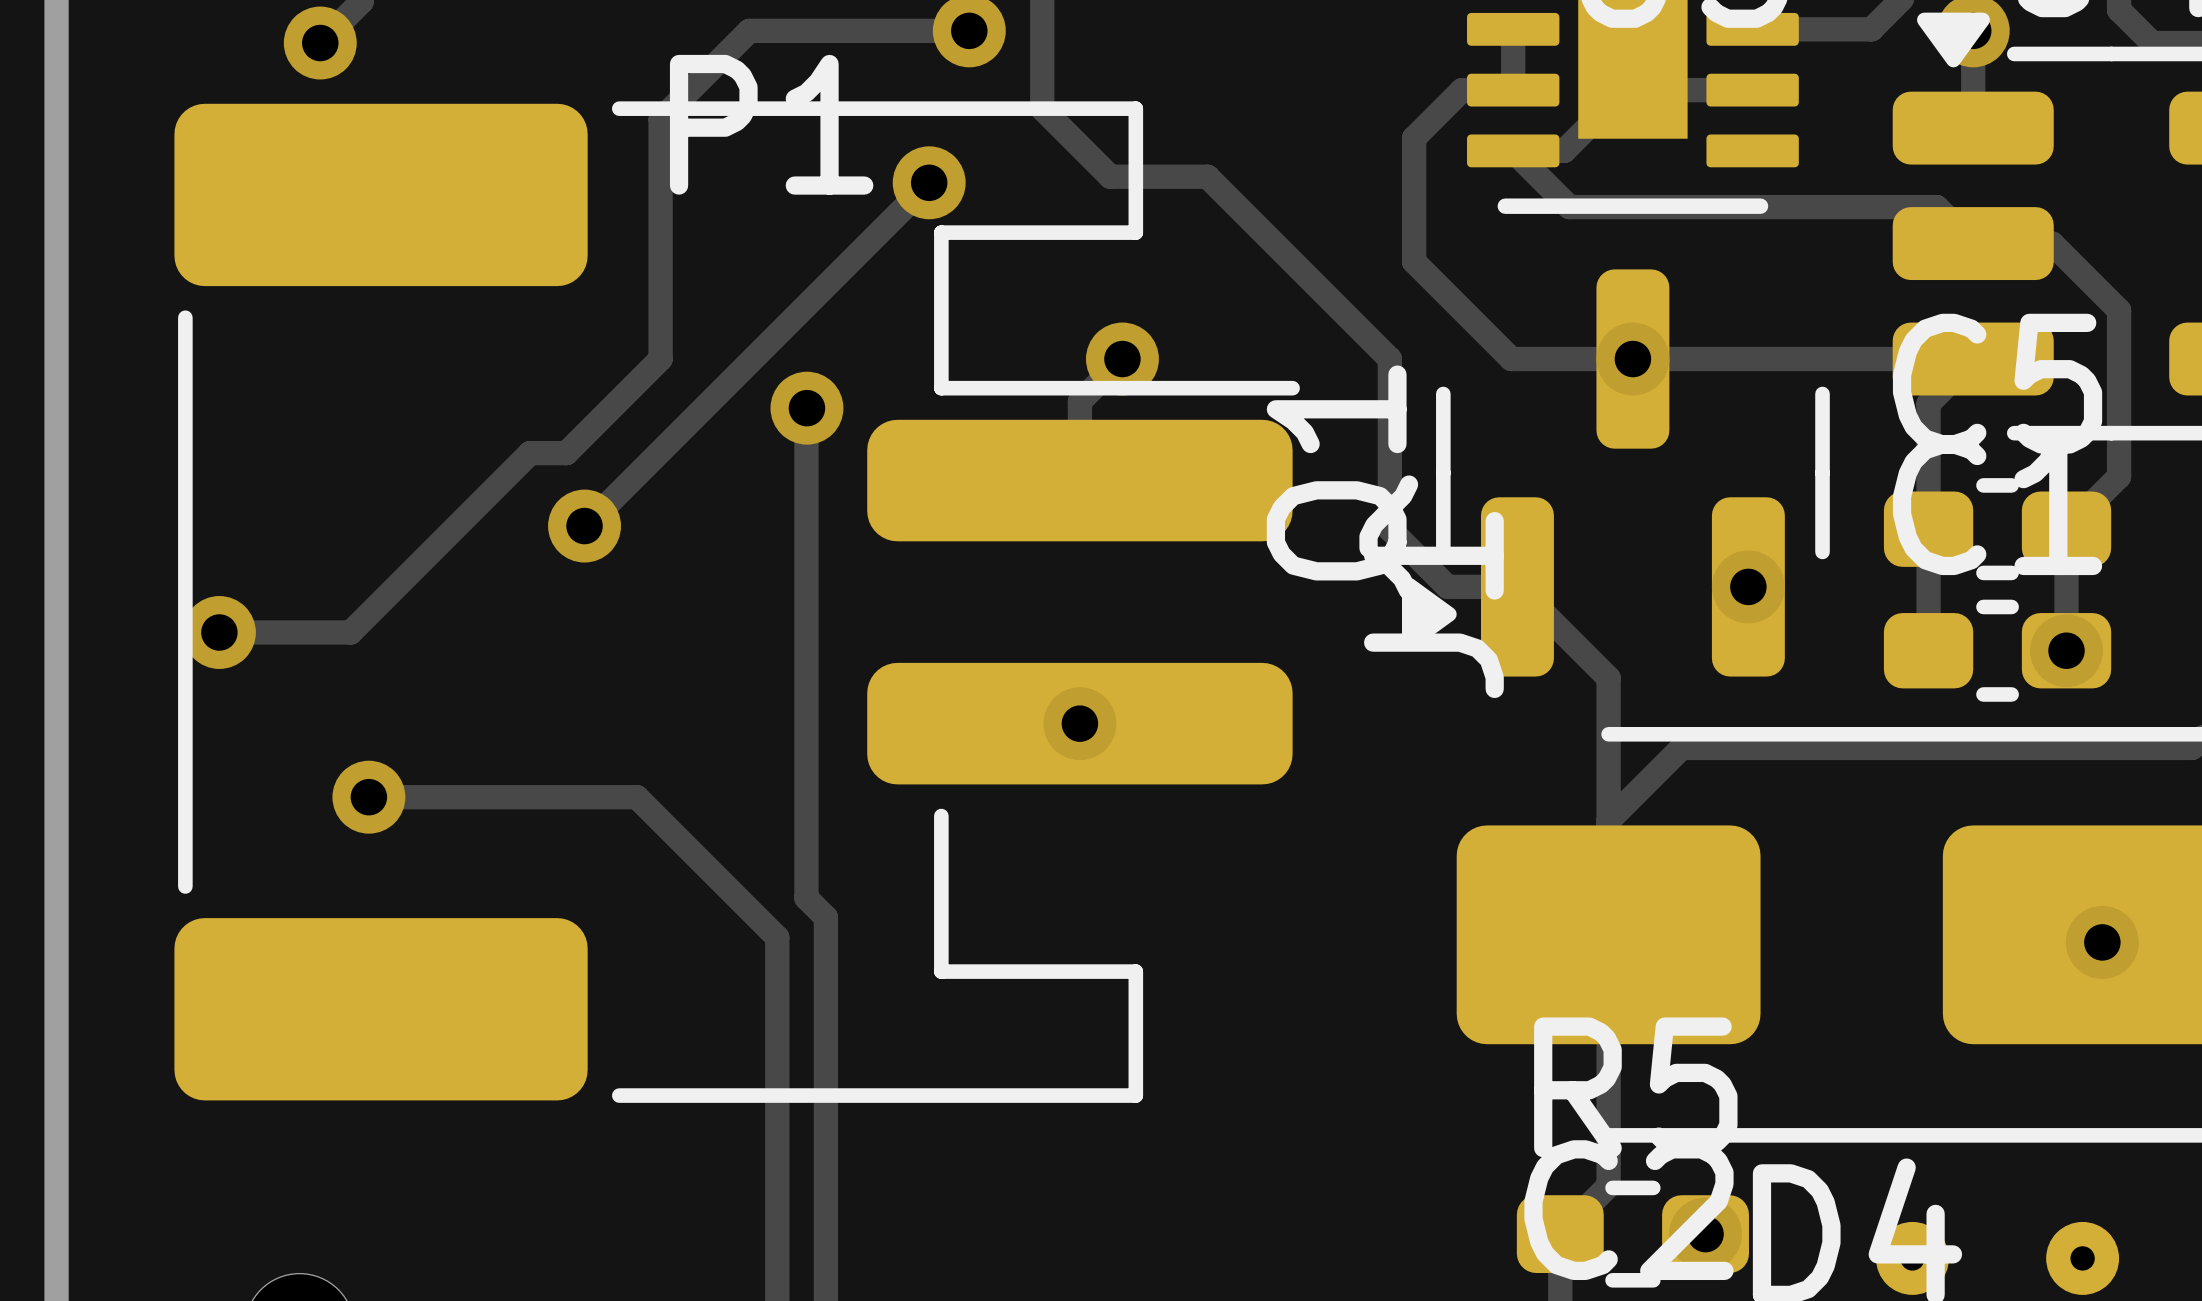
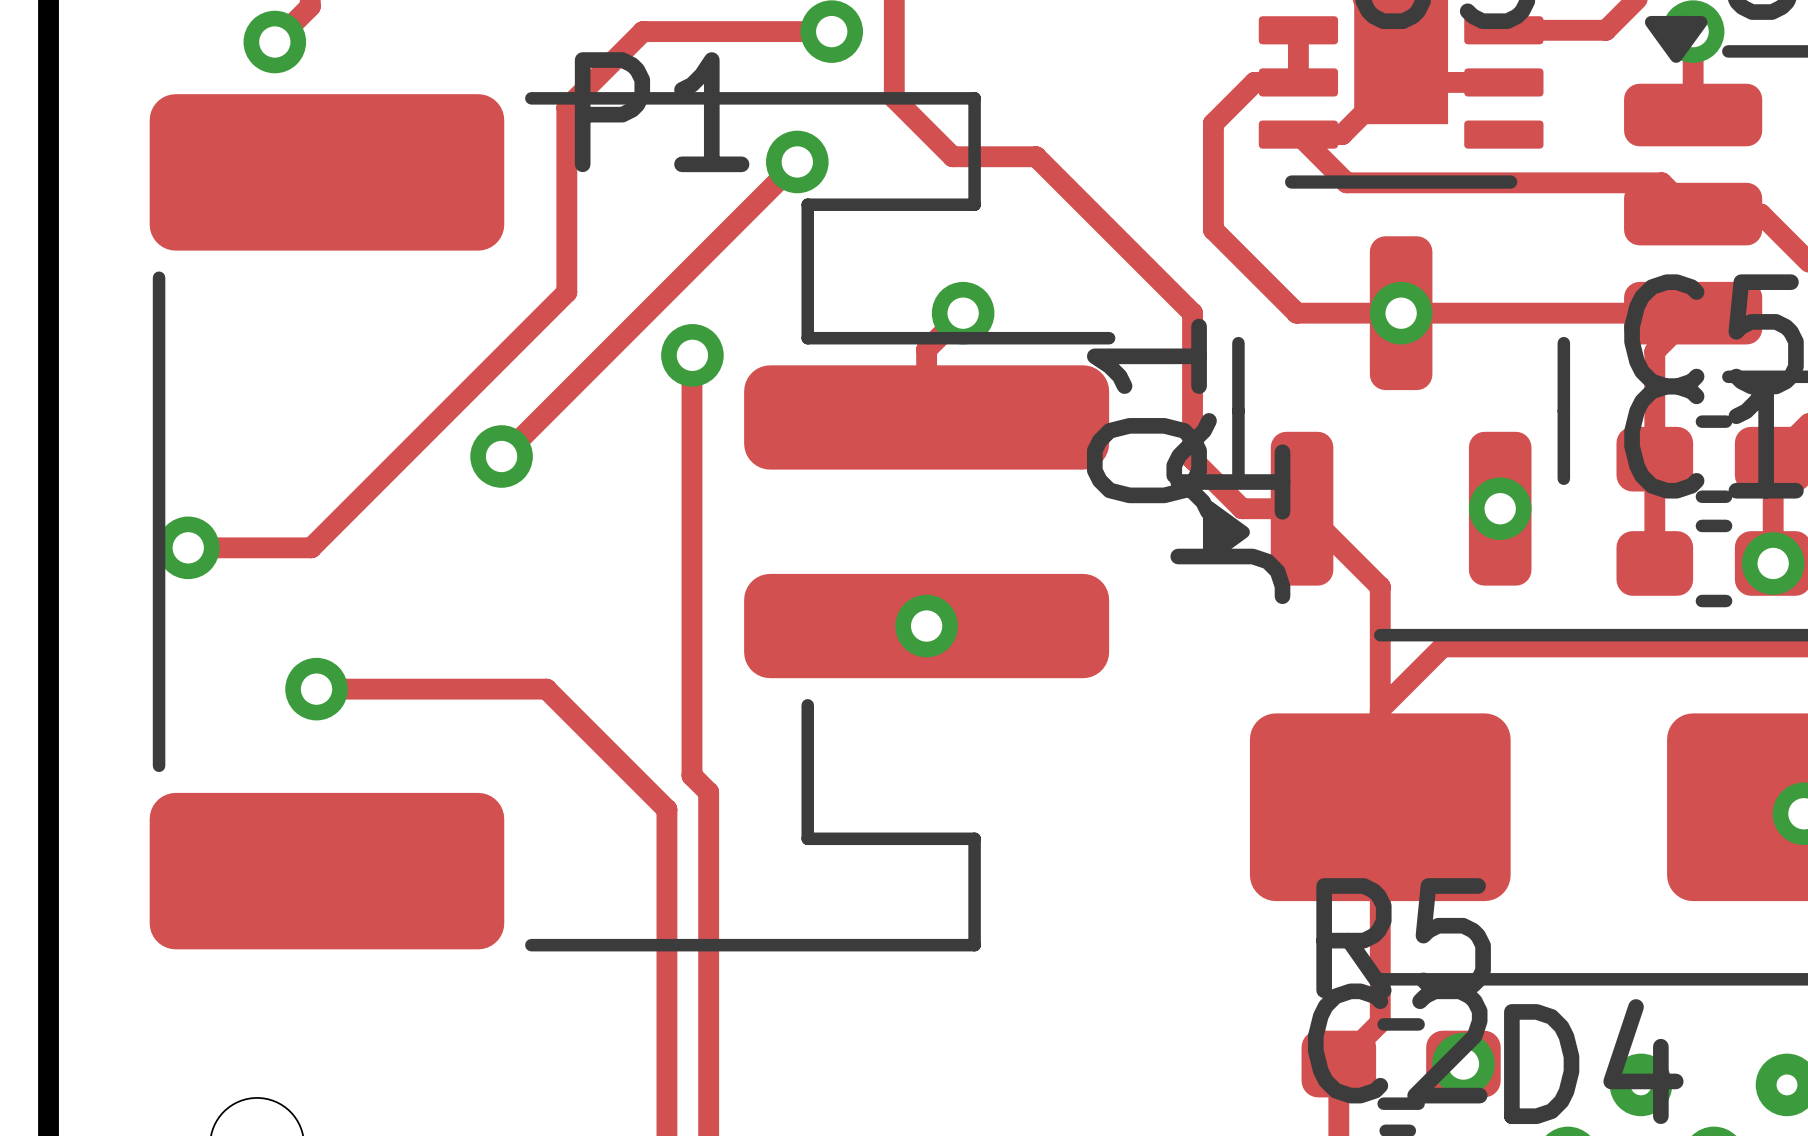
track: (660, 334) (660, 359) (566, 453) (530, 453) (350, 632) -> (566, 292) (311, 547) (300, 547)

